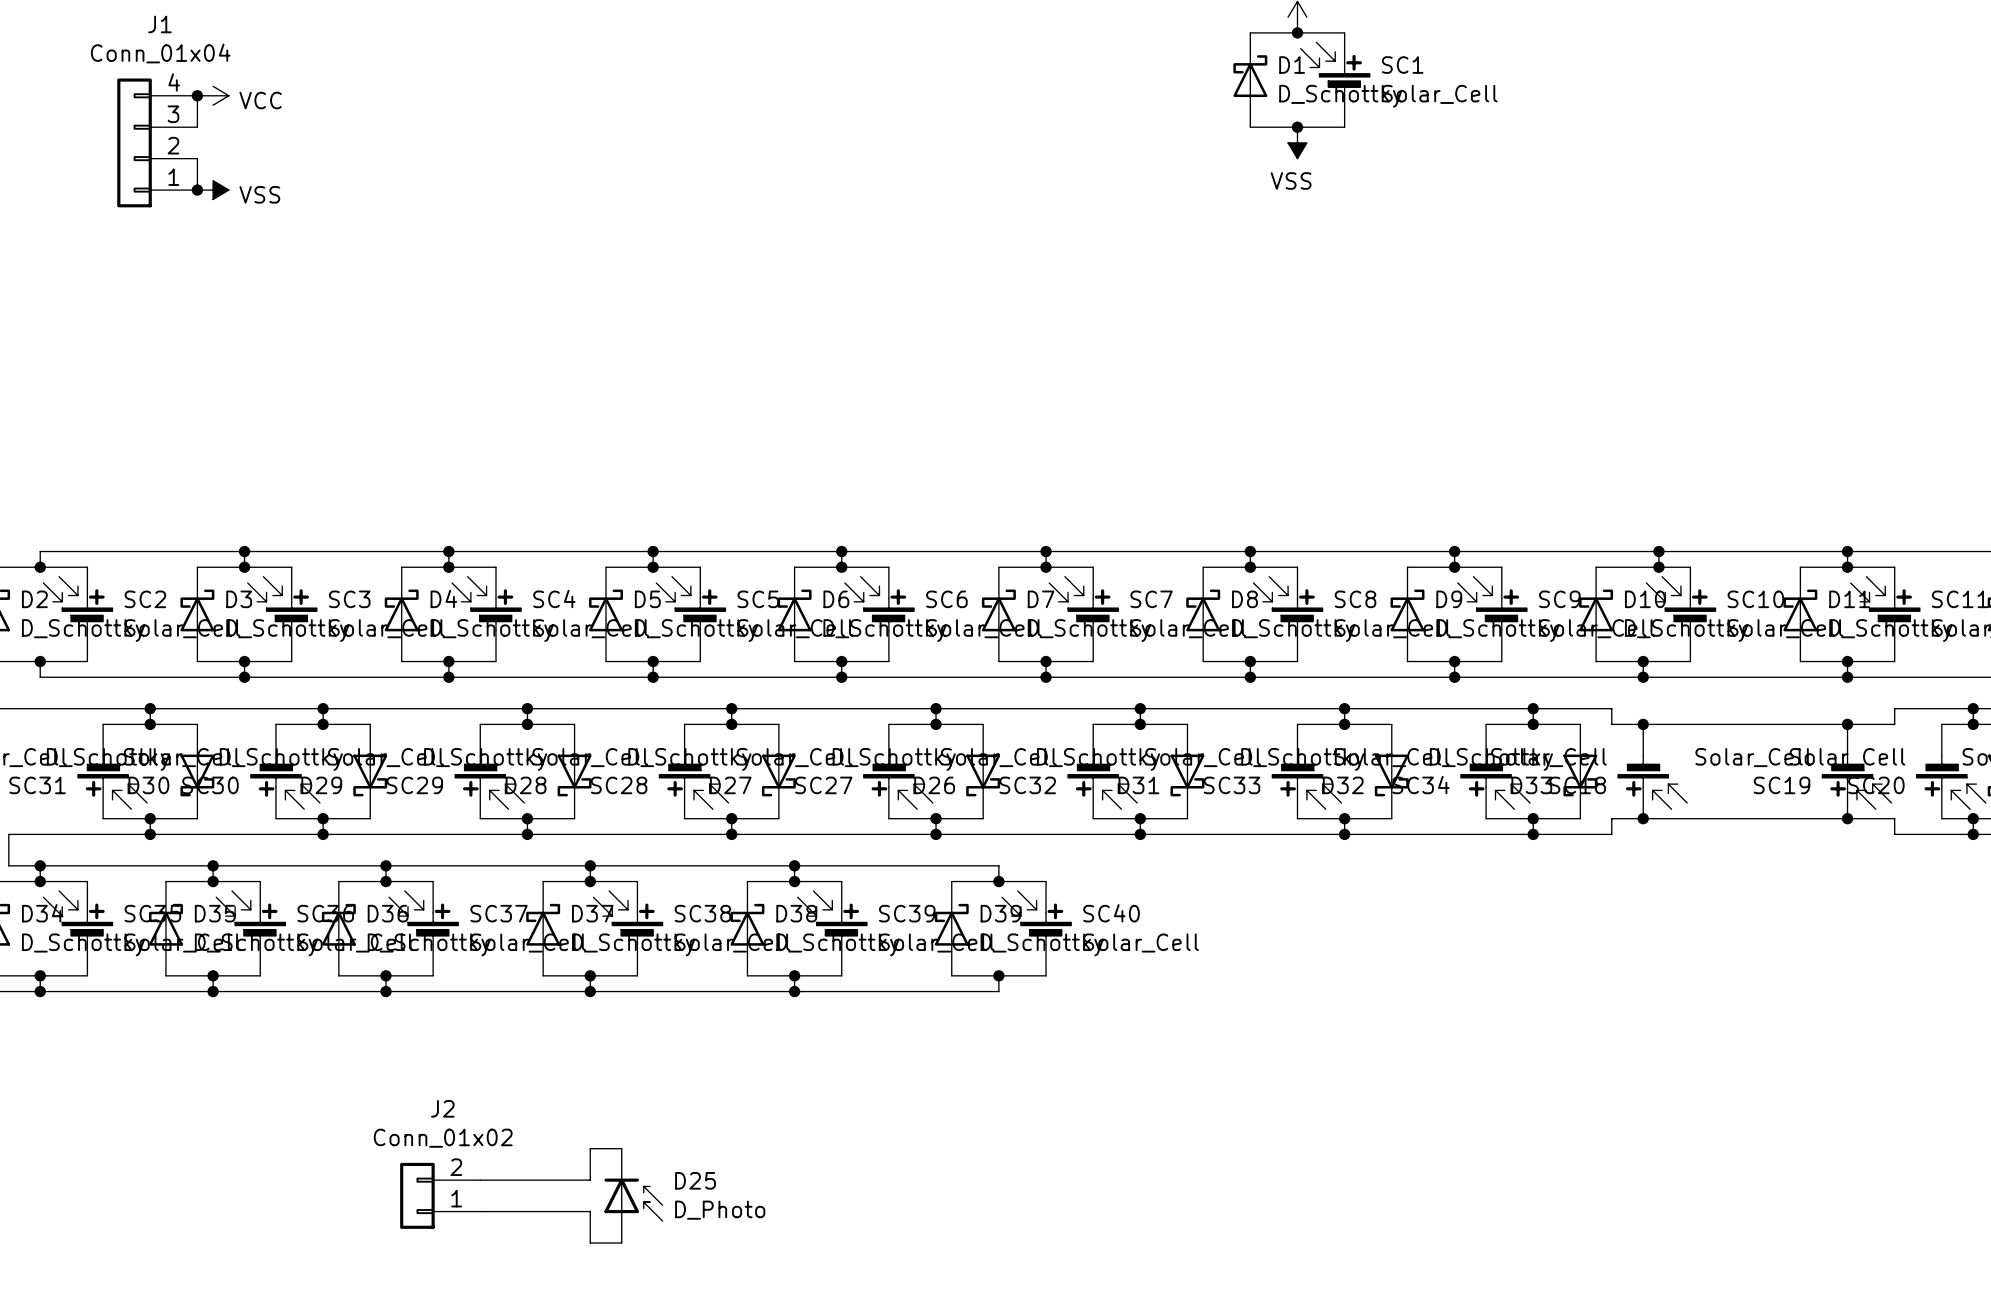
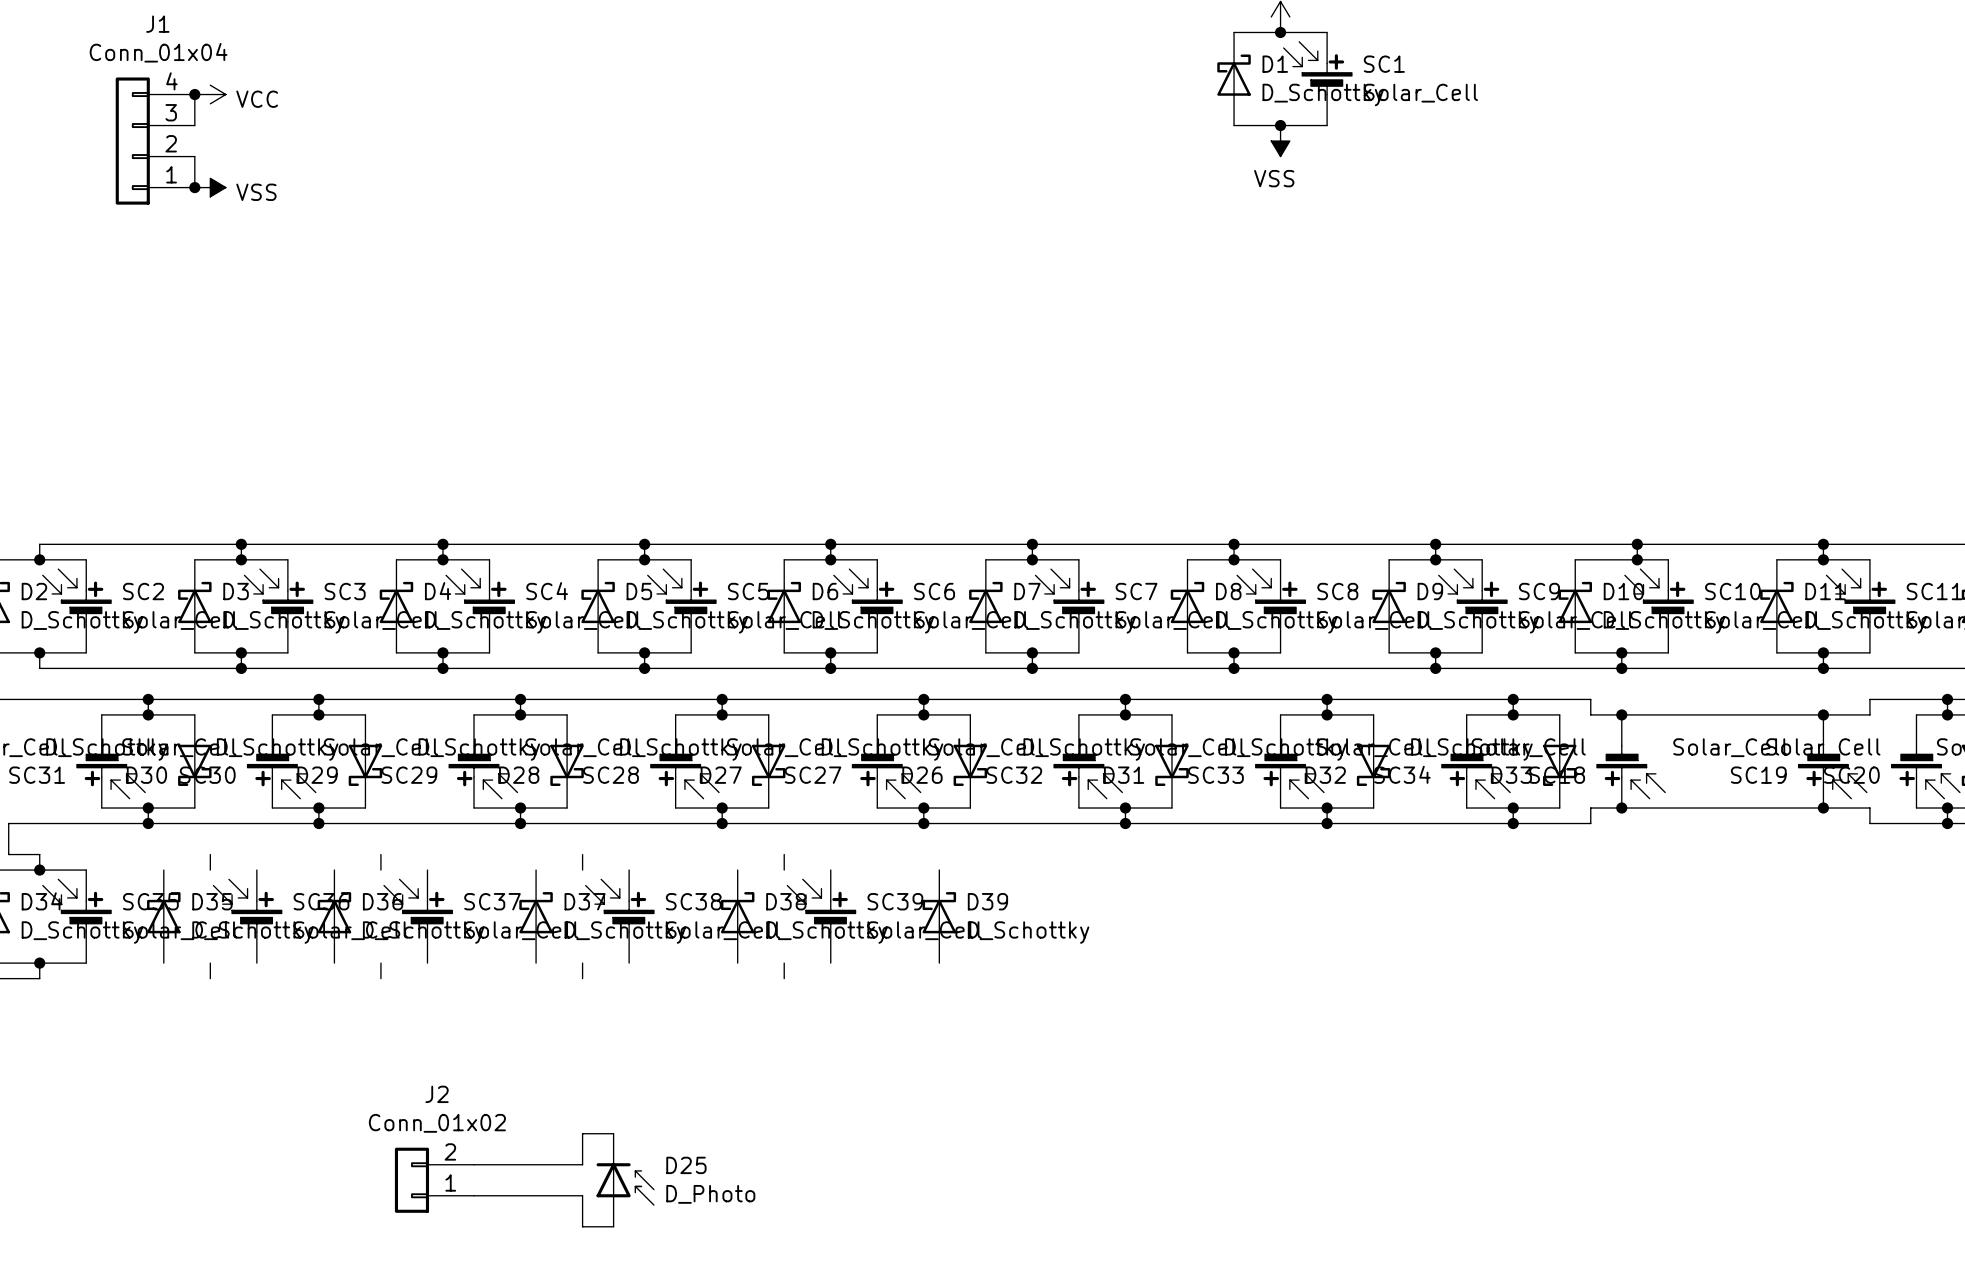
wire: (40, 865) (998, 865) (998, 881) -> none
junction: (40, 865) -> none
junction: (213, 865) -> none
junction: (385, 865) -> none
junction: (590, 865) -> none
junction: (794, 865) -> none
wire: (165, 881) (260, 881) -> none
junction: (213, 881) -> none
wire: (338, 881) (433, 881) -> none
junction: (385, 881) -> none
wire: (543, 881) (637, 881) -> none
junction: (590, 881) -> none
wire: (747, 881) (841, 881) -> none
junction: (794, 881) -> none
wire: (951, 881) (1046, 881) -> none
junction: (998, 881) -> none
SC40: Solar_Cell (1036, 928) -> none
wire: (165, 975) (260, 975) -> none
junction: (213, 975) -> none
wire: (338, 975) (433, 975) -> none
junction: (385, 975) -> none
wire: (543, 975) (637, 975) -> none
junction: (590, 975) -> none
wire: (747, 975) (841, 975) -> none
junction: (794, 975) -> none
wire: (951, 975) (1046, 975) -> none
wire: (998, 975) (998, 991) (40, 991) -> none
junction: (998, 975) -> none
junction: (40, 991) -> none
junction: (213, 991) -> none
junction: (385, 991) -> none
junction: (590, 991) -> none
junction: (794, 991) -> none

